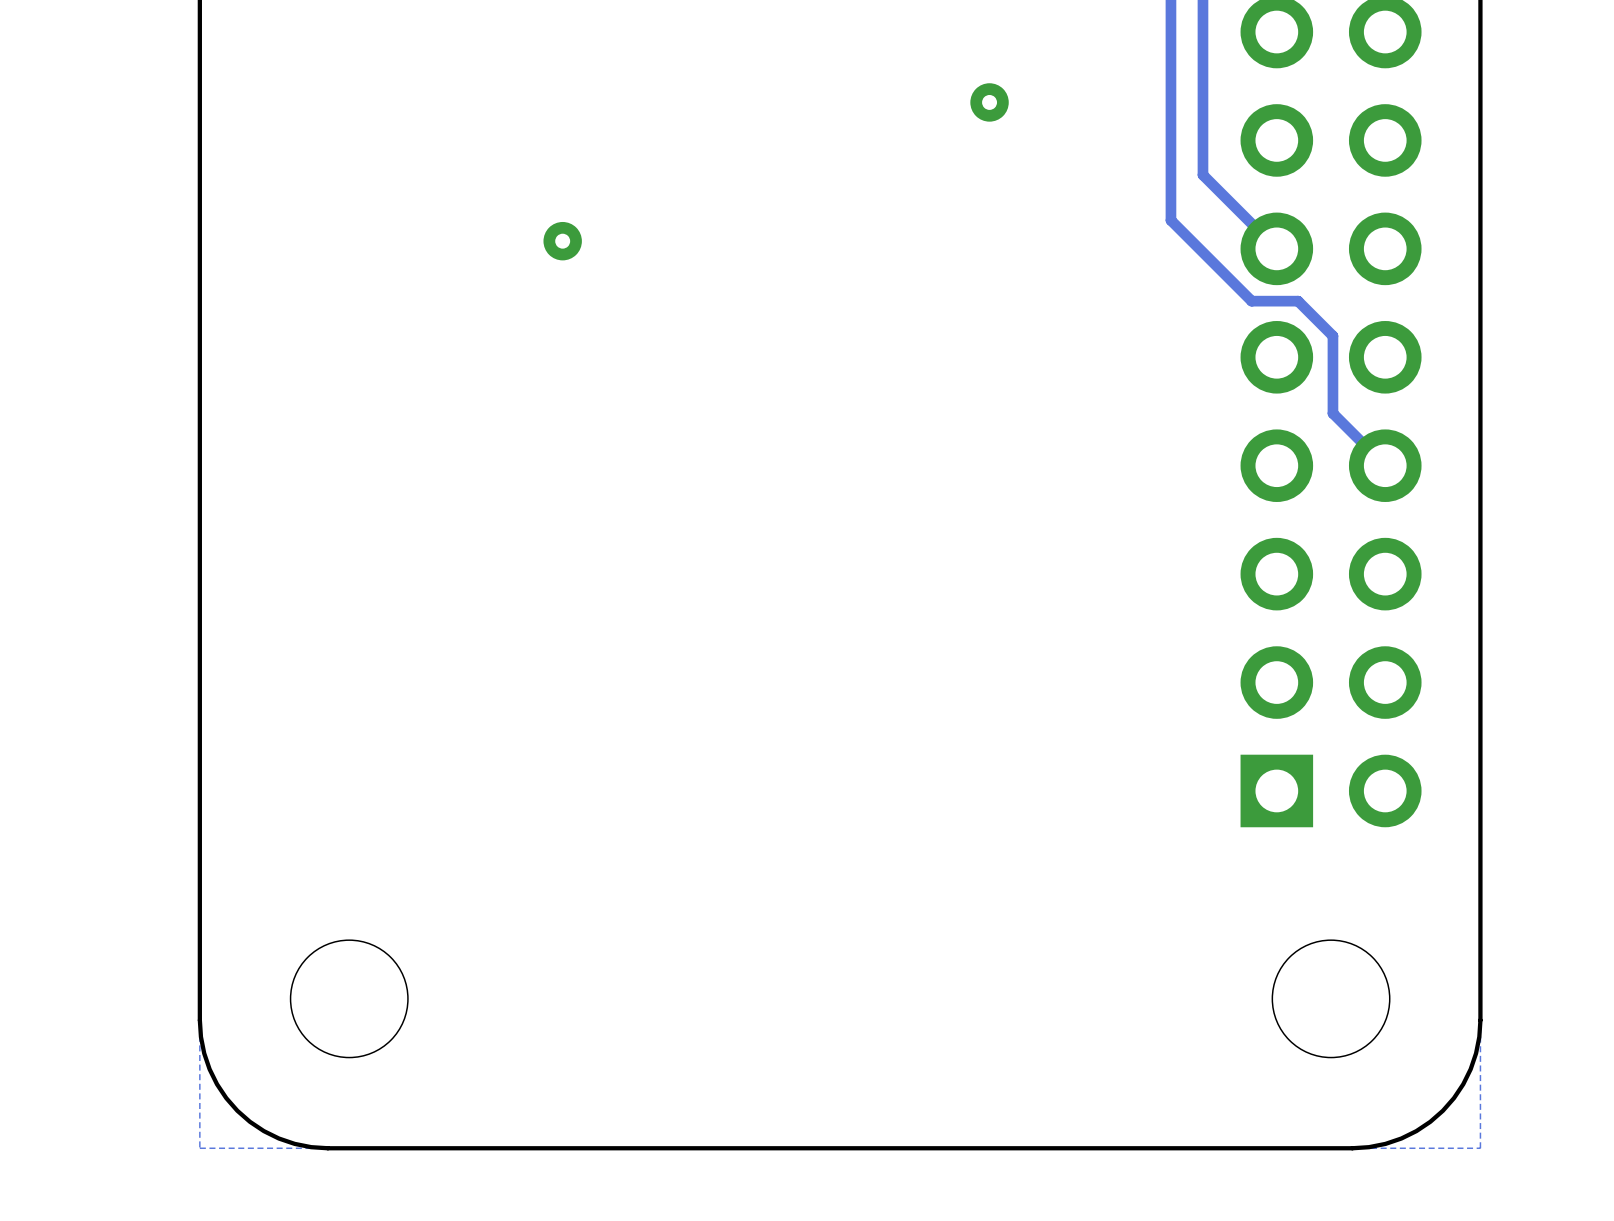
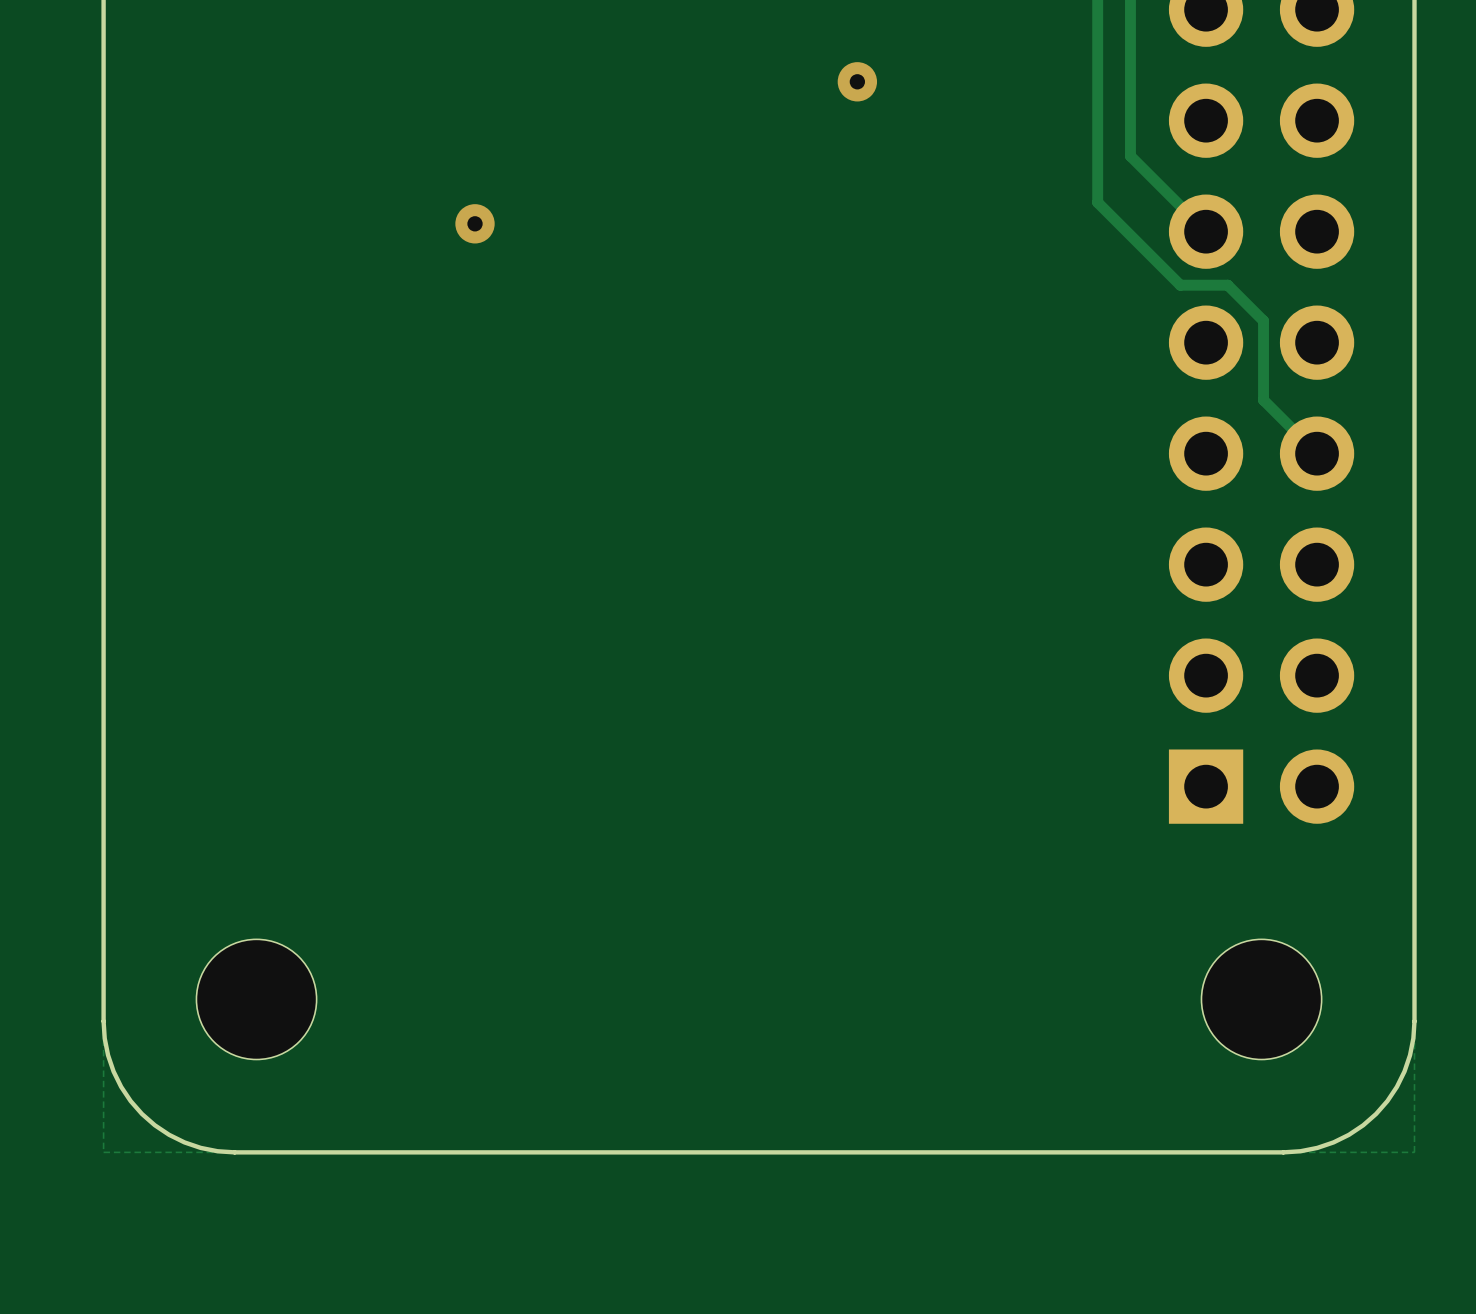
via position: (989, 102) -> (857, 81)

